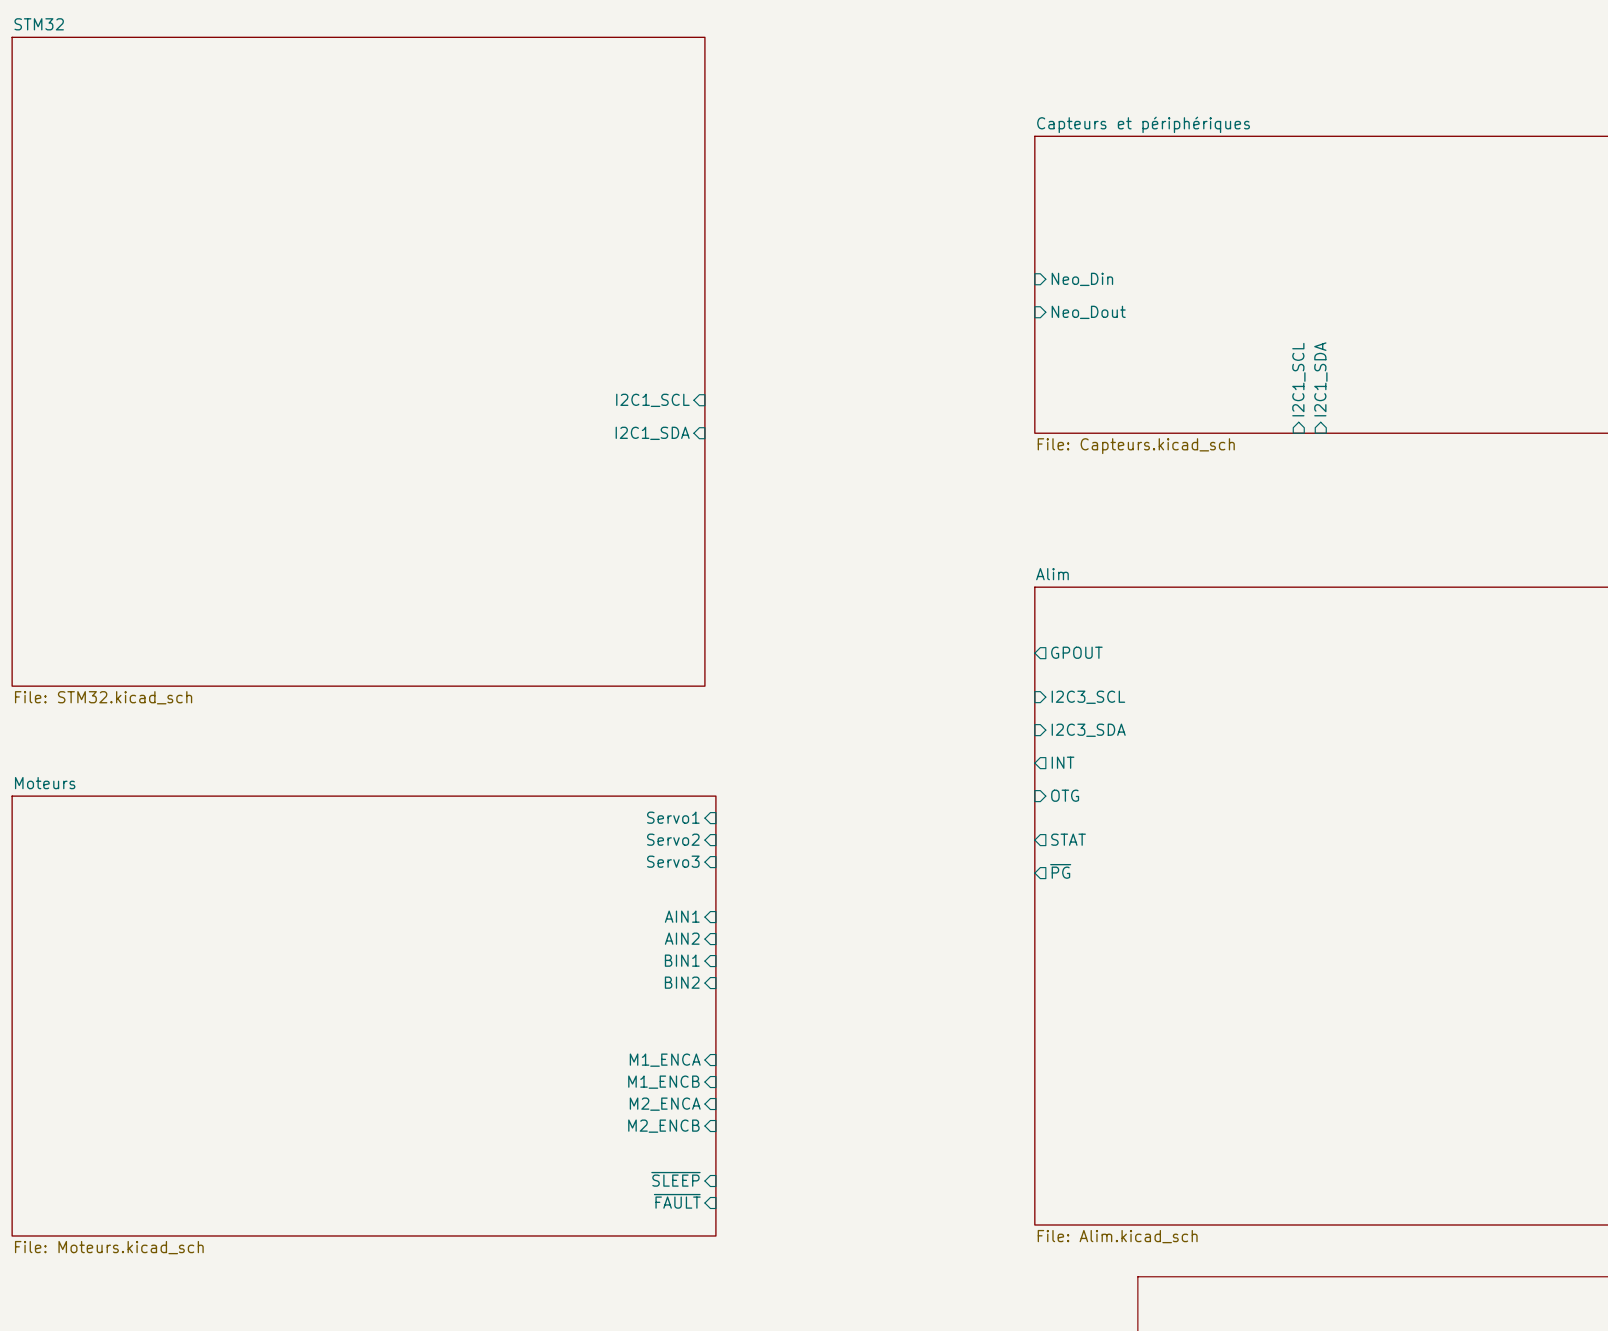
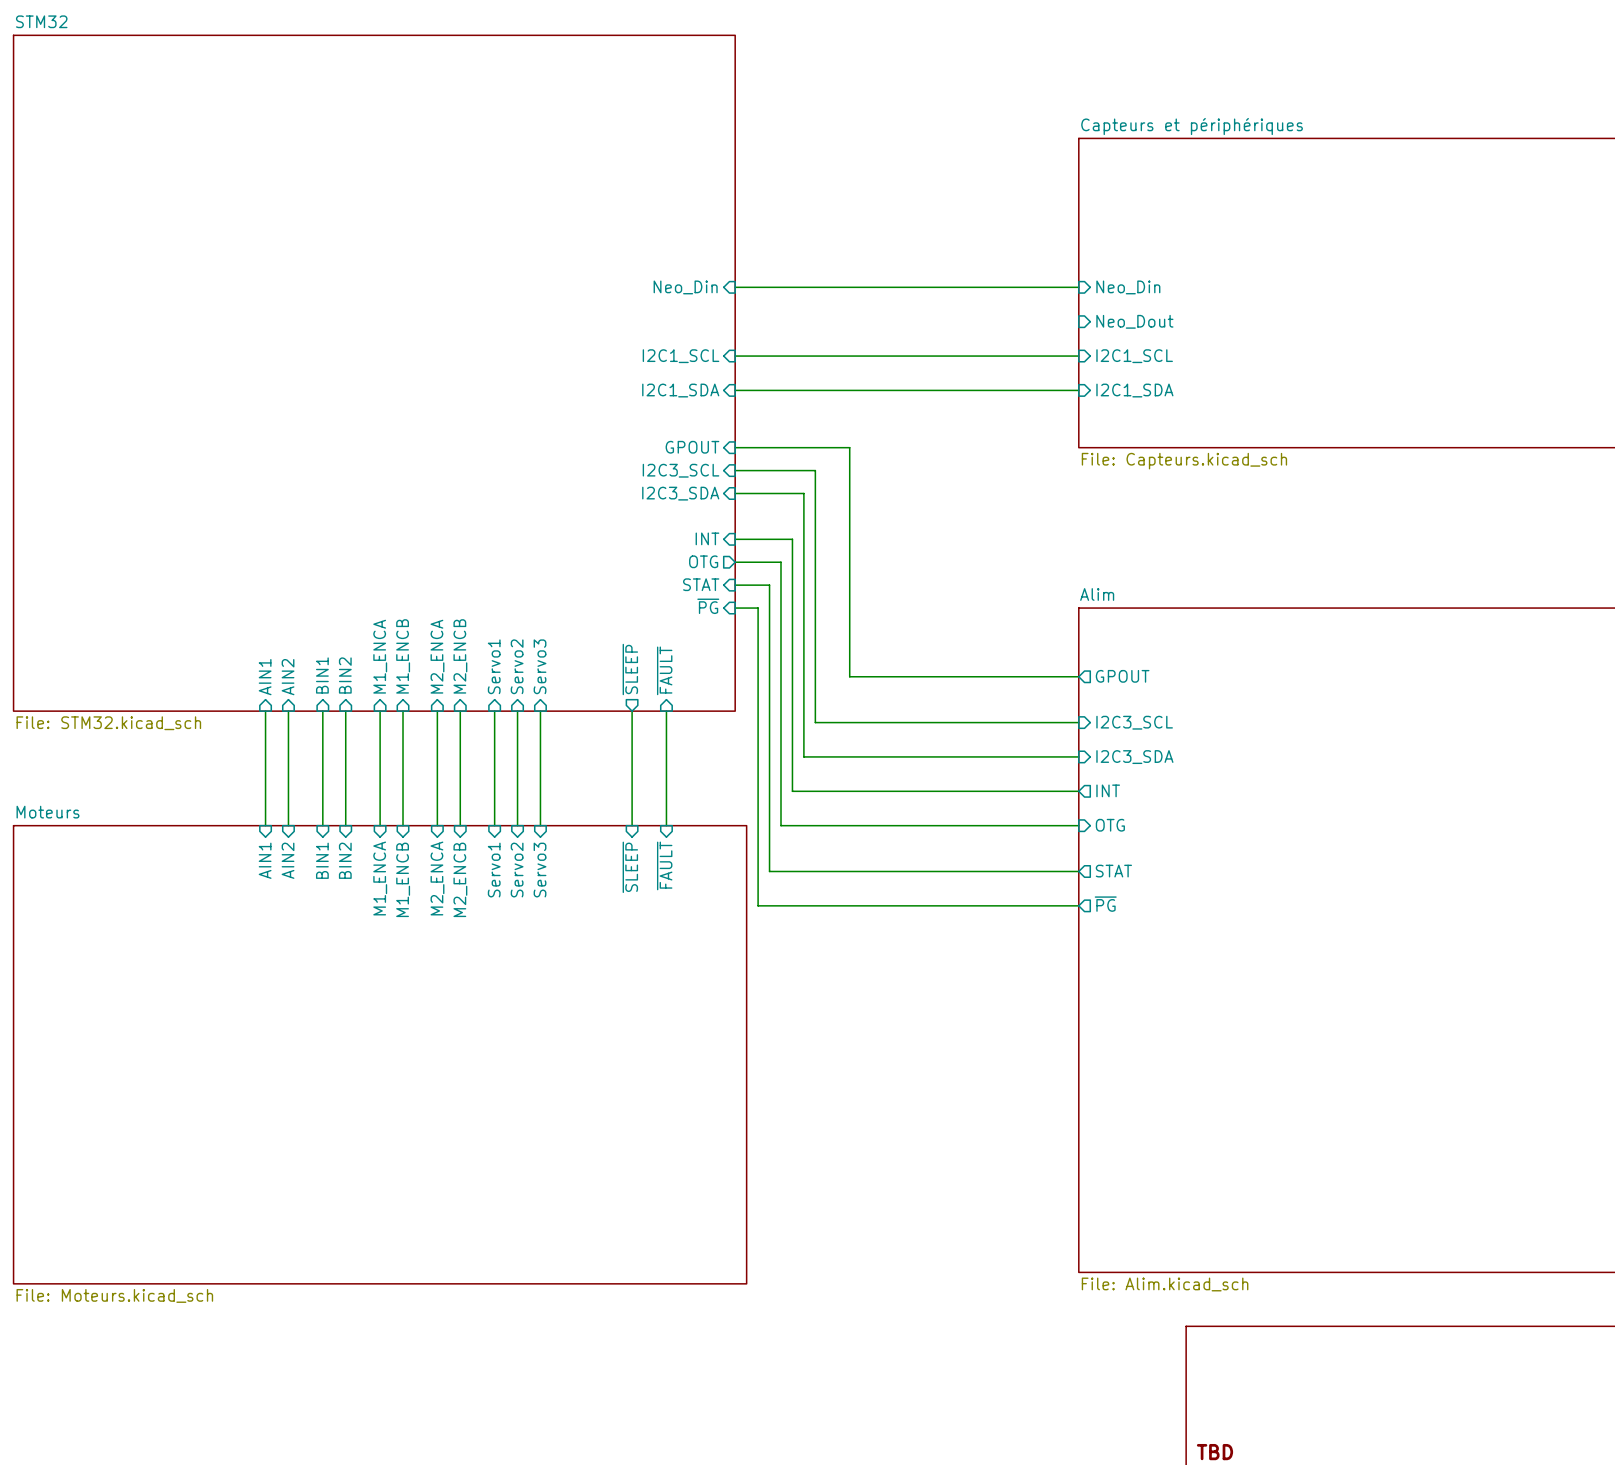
sheet pin: none -> Neo_Din (685, 287)
wire: none -> (735, 287) (1078, 287)
wire: none -> (735, 356) (1078, 356)
sheet pin: none -> I2C1_SCL (1134, 356)
sheet pin: none -> I2C1_SDA (680, 390)
wire: none -> (735, 390) (1078, 390)
sheet pin: none -> I2C1_SDA (1134, 390)
sheet pin: I2C1_SCL (1298, 379) -> none
sheet pin: I2C1_SDA (1320, 379) -> none
sheet pin position: I2C1_SCL (652, 400) -> I2C1_SCL (681, 356)
sheet pin: I2C1_SDA (652, 433) -> GPOUT (692, 447)
wire: none -> (735, 447) (849, 447) (849, 676) (1078, 676)
sheet pin: none -> I2C3_SCL (681, 470)
wire: none -> (735, 470) (815, 470) (815, 722) (1078, 722)
sheet pin: none -> I2C3_SDA (680, 493)
wire: none -> (735, 493) (803, 493) (803, 756) (1078, 756)
sheet pin: none -> INT (707, 538)
wire: none -> (735, 539) (792, 539) (792, 791) (1078, 791)
sheet pin: none -> OTG (703, 561)
wire: none -> (735, 562) (780, 562) (780, 825) (1078, 825)
sheet pin: none -> STAT (701, 584)
wire: none -> (735, 585) (769, 585) (769, 871) (1078, 871)
sheet pin: none -> ~{PG} (708, 606)
wire: none -> (735, 608) (758, 608) (758, 905) (1078, 905)
sheet pin: none -> M1_ENCA (380, 656)
sheet pin: none -> M1_ENCB (403, 656)
sheet pin: none -> M2_ENCA (437, 656)
sheet pin: none -> M2_ENCB (460, 656)
sheet pin: none -> Servo1 (494, 666)
sheet pin: none -> Servo2 (517, 666)
sheet pin: none -> Servo3 (540, 666)
sheet pin: none -> ~{SLEEP} (630, 669)
sheet pin: none -> ~{FAULT} (664, 670)
sheet pin: none -> BIN1 (322, 675)
sheet pin: none -> BIN2 (345, 675)
sheet pin: none -> AIN1 (265, 677)
sheet pin: none -> AIN2 (288, 677)
wire: none -> (265, 711) (265, 825)
wire: none -> (288, 711) (288, 825)
wire: none -> (322, 711) (322, 825)
wire: none -> (345, 711) (345, 825)
wire: none -> (380, 711) (380, 825)
wire: none -> (403, 711) (403, 825)
wire: none -> (437, 711) (437, 825)
wire: none -> (460, 711) (460, 825)
wire: none -> (494, 711) (494, 825)
wire: none -> (517, 711) (517, 825)
wire: none -> (540, 711) (540, 825)
wire: none -> (632, 711) (632, 825)
wire: none -> (666, 711) (666, 825)
sheet pin: Servo1 (673, 817) -> none
sheet pin: none -> AIN1 (265, 860)
sheet pin: none -> AIN2 (288, 860)
sheet pin: none -> BIN1 (322, 860)
sheet pin: none -> BIN2 (345, 860)
sheet pin: none -> ~{FAULT} (664, 865)
sheet pin: none -> ~{SLEEP} (630, 867)
sheet pin: none -> Servo1 (494, 870)
sheet pin: none -> Servo2 (517, 870)
sheet pin: none -> Servo3 (540, 870)
sheet pin: Servo2 (673, 839) -> none
sheet pin: none -> M1_ENCA (380, 878)
sheet pin: none -> M2_ENCA (437, 878)
sheet pin: none -> M1_ENCB (403, 879)
sheet pin: none -> M2_ENCB (460, 879)
sheet pin: Servo3 (673, 861) -> none
sheet pin: AIN1 (682, 916) -> none
sheet pin: AIN2 (682, 938) -> none
sheet pin: BIN1 (682, 960) -> none
sheet pin: BIN2 (682, 982) -> none
sheet pin: M1_ENCA (665, 1060) -> none
sheet pin: M1_ENCB (663, 1082) -> none
sheet pin: M2_ENCA (665, 1104) -> none
sheet pin: M2_ENCB (663, 1126) -> none
sheet pin: ~{SLEEP} (675, 1179) -> none
sheet pin: ~{FAULT} (677, 1201) -> none

